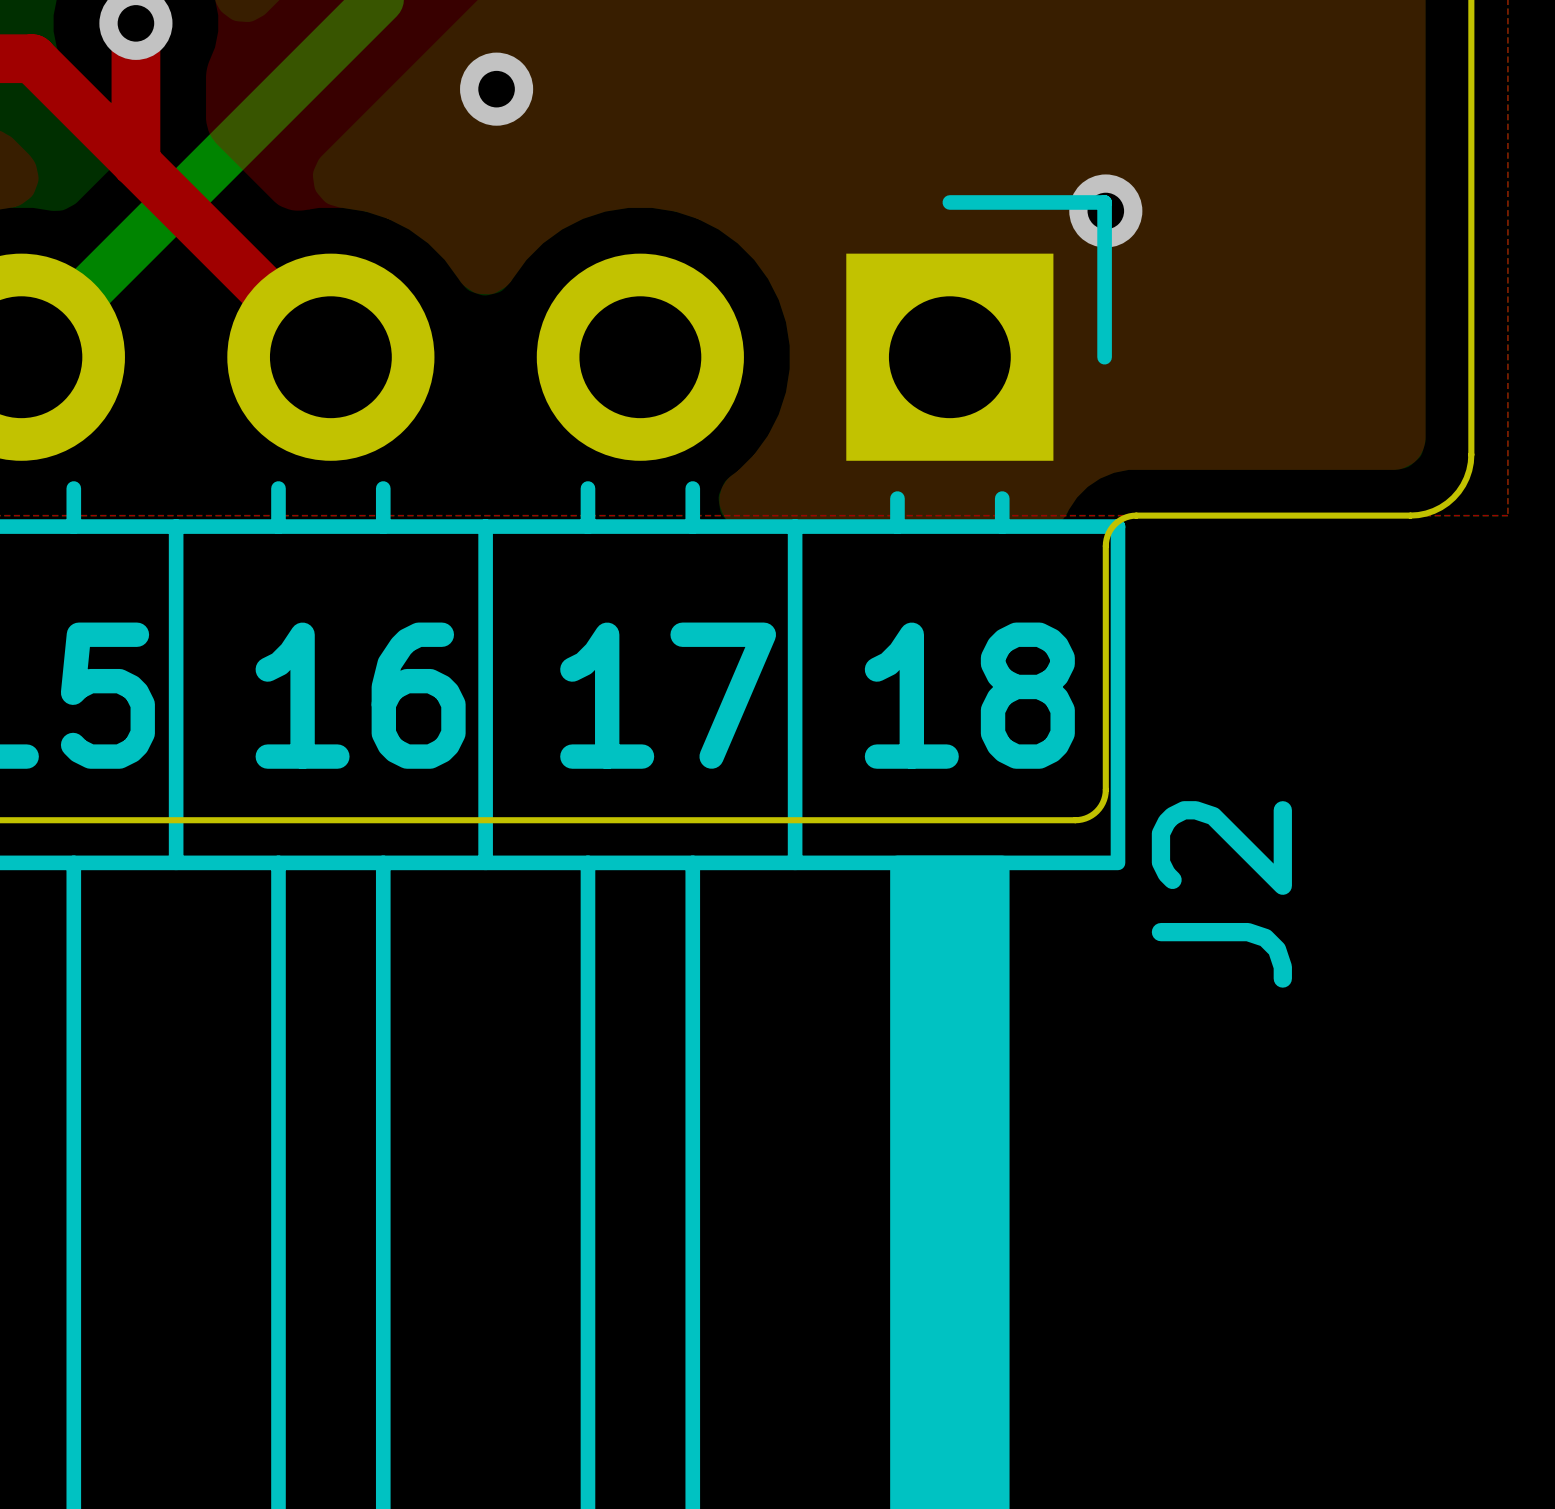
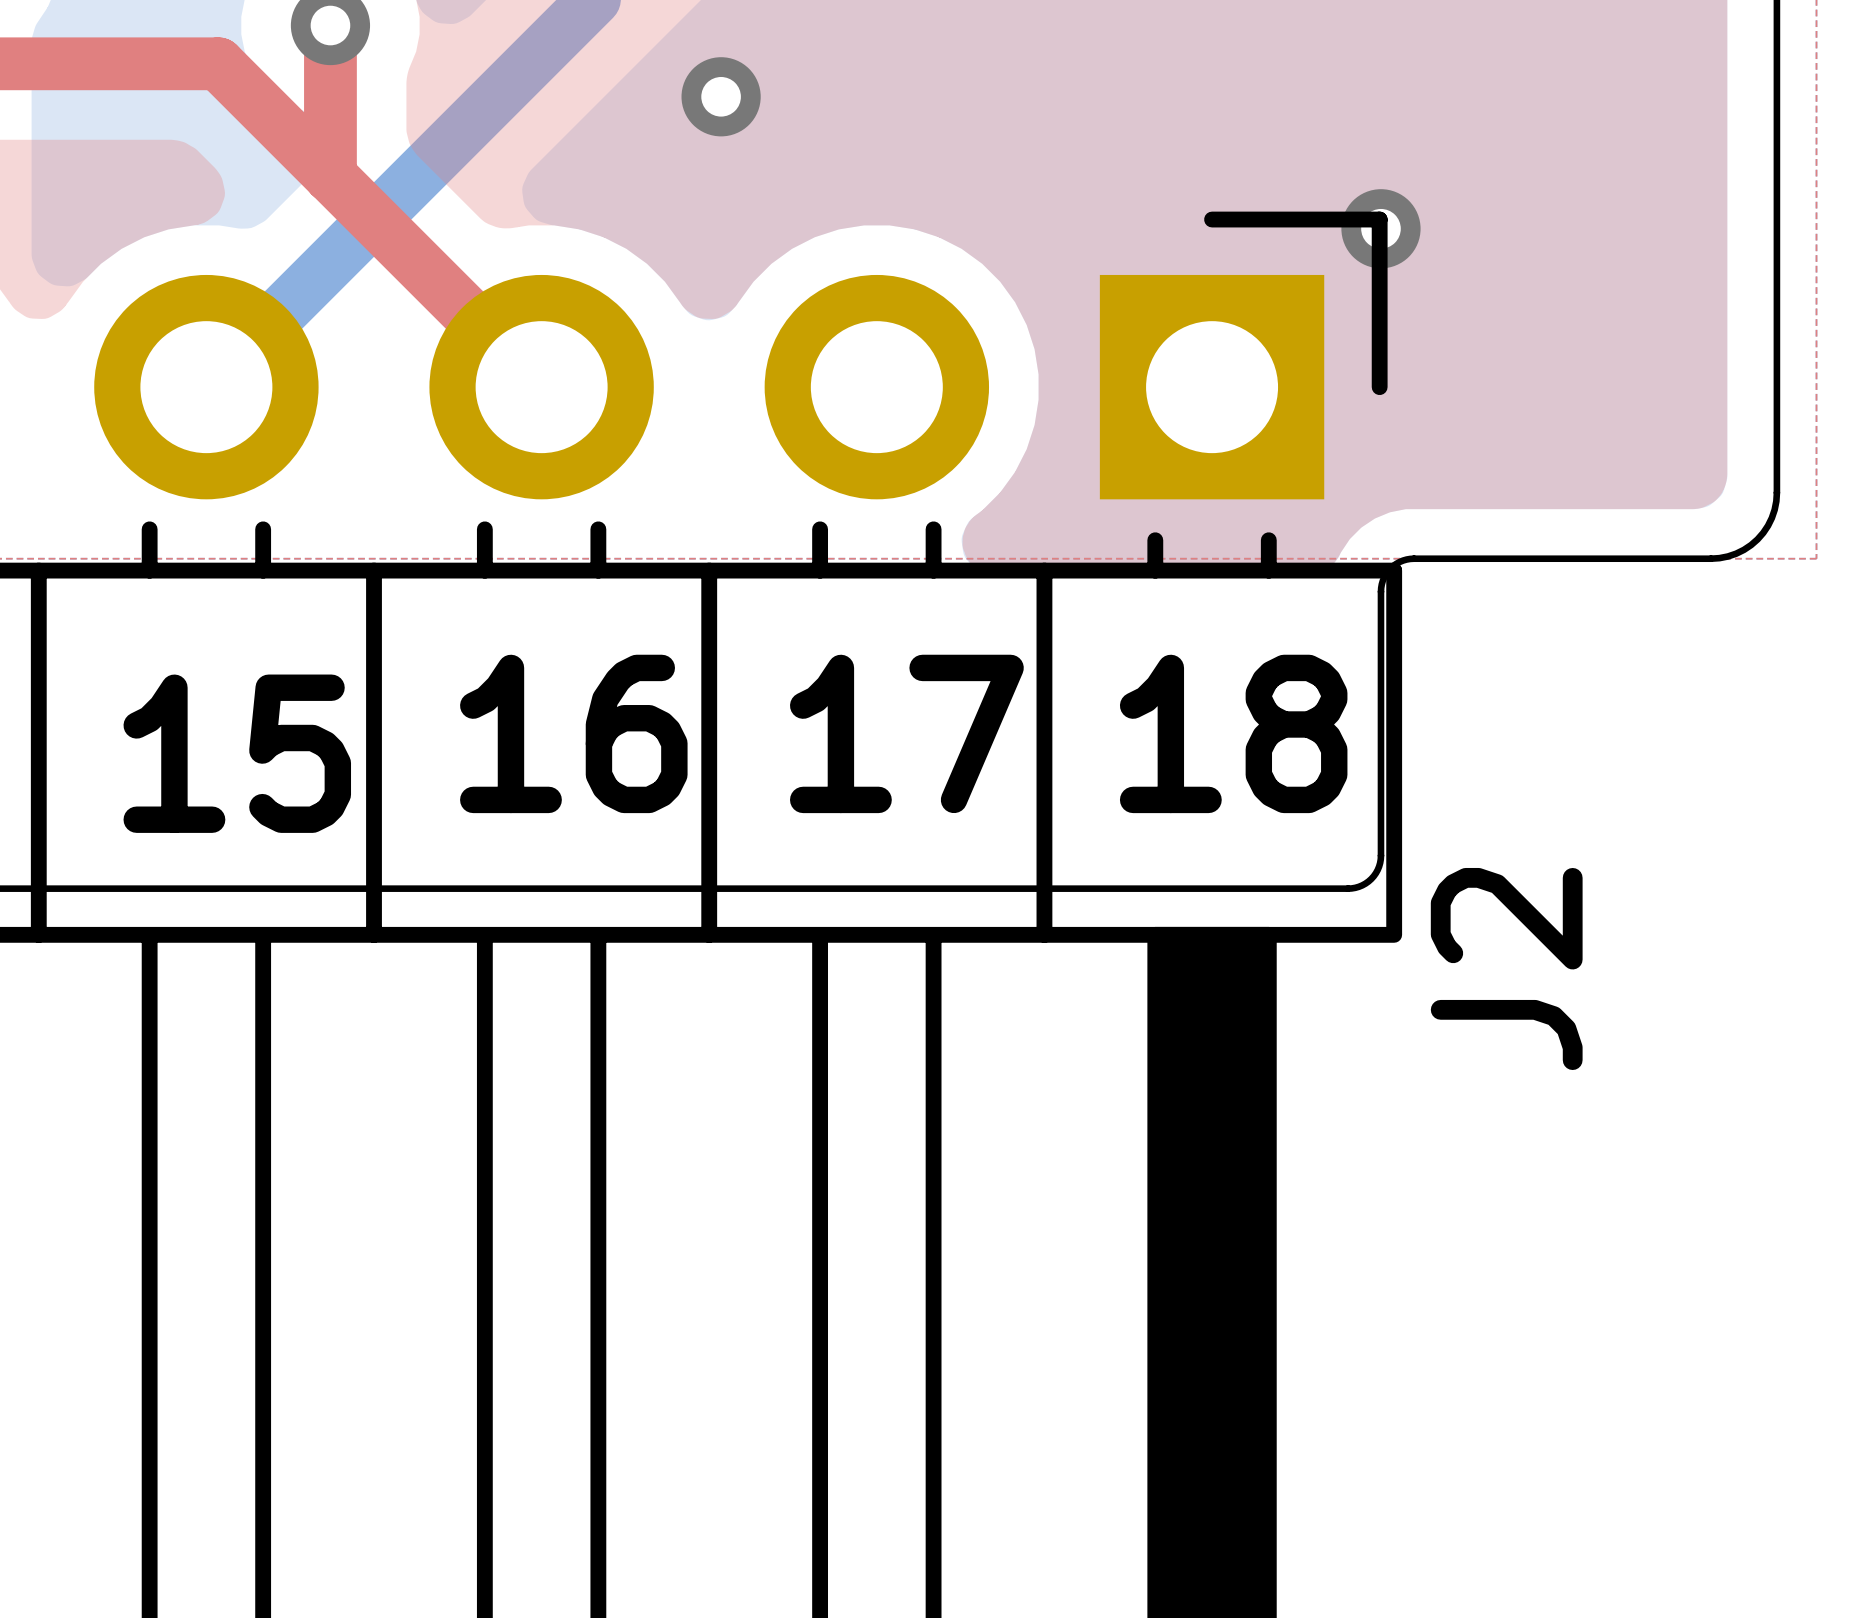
text position: 16 (360, 695) -> 16 (573, 733)
text position: 17 (668, 695) -> 17 (906, 733)
text position: 18 (969, 695) -> 18 (1233, 733)

